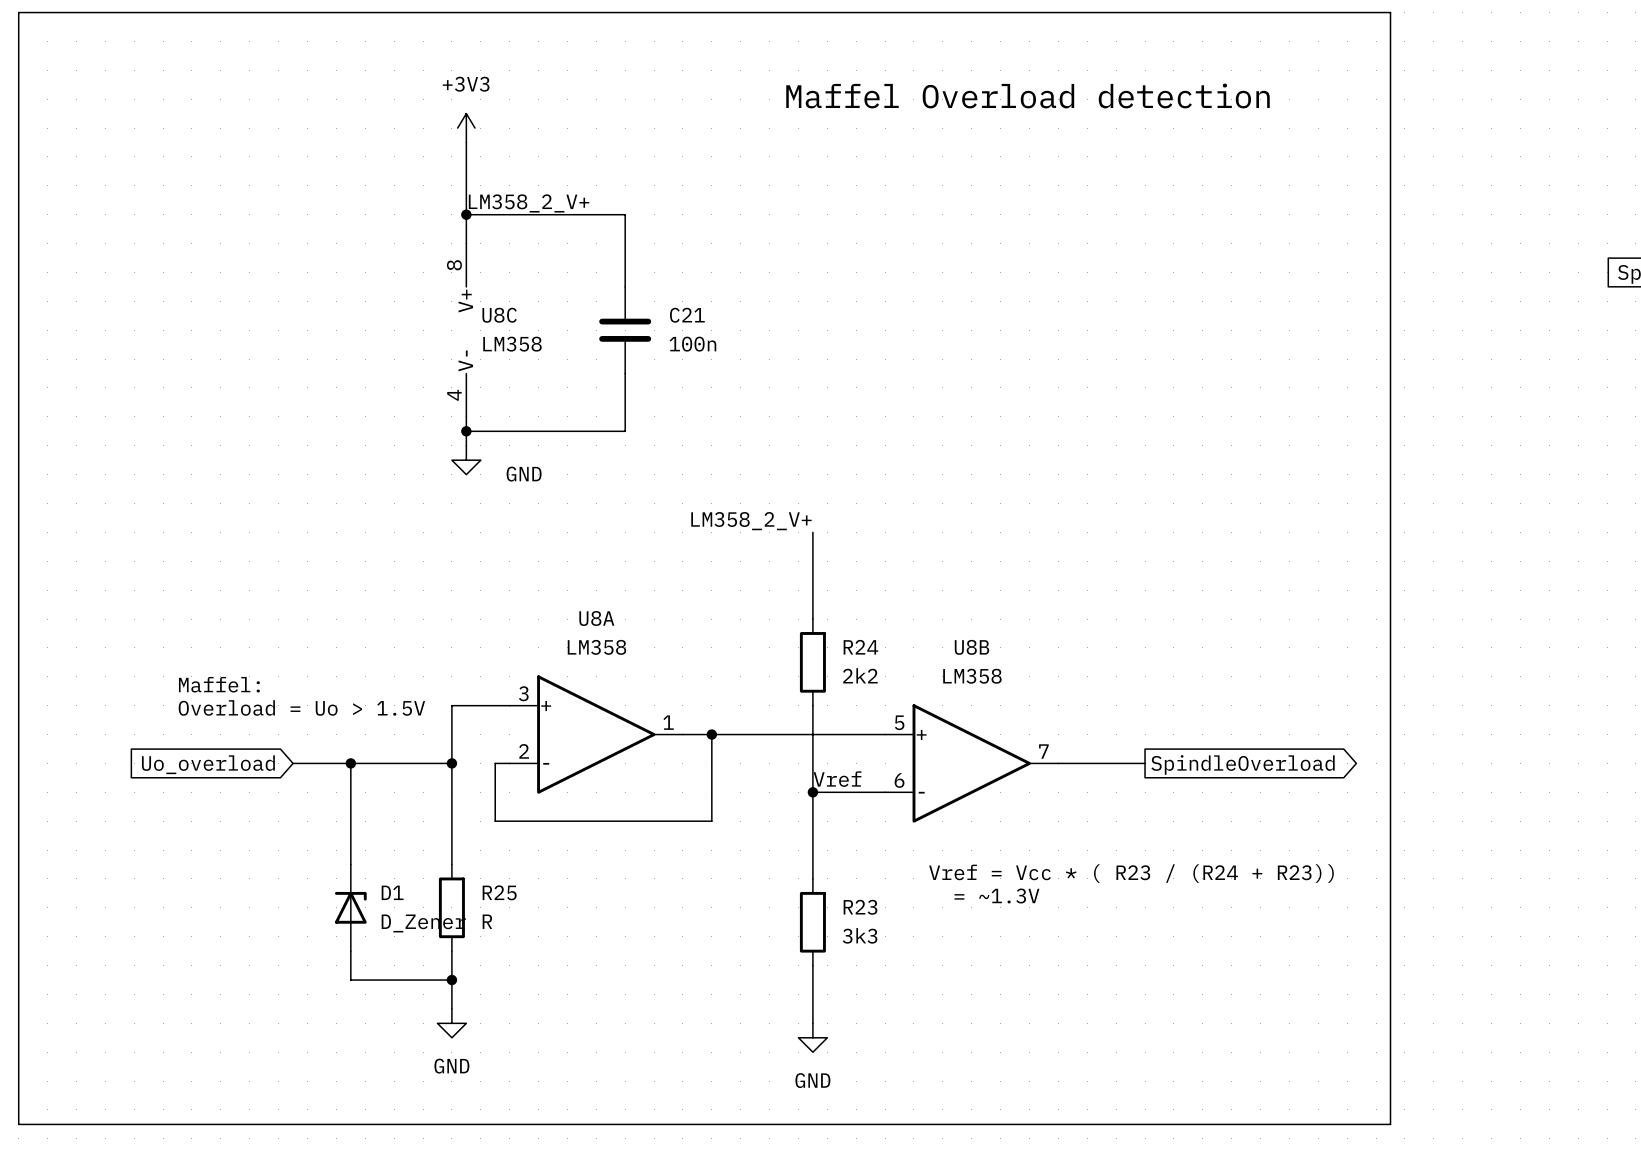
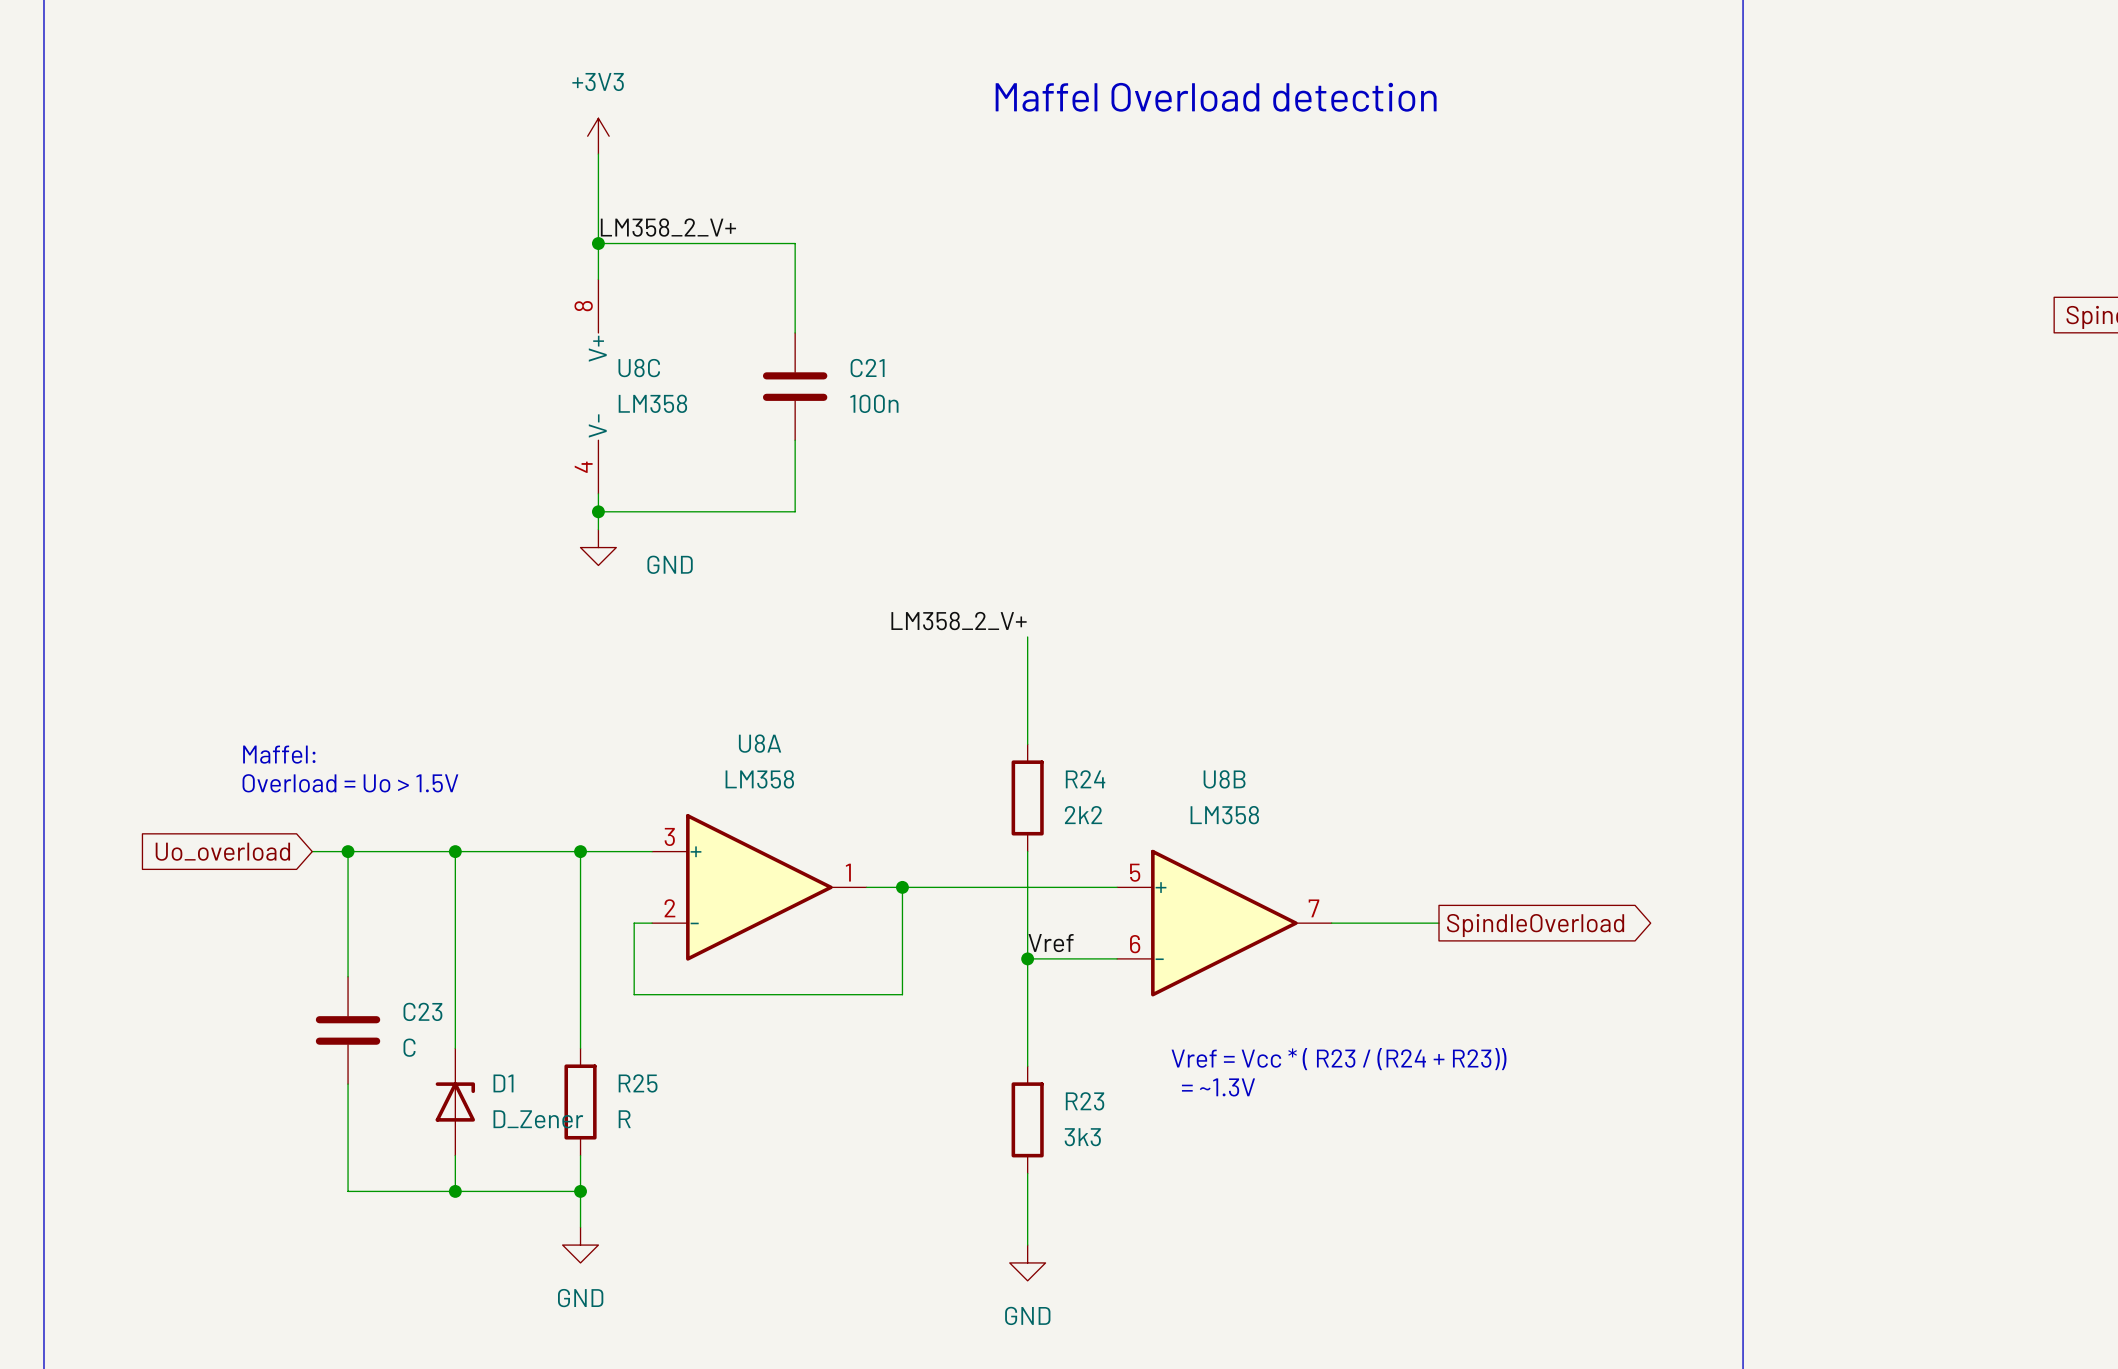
text position: Maffel: (219, 684) -> Maffel: (279, 754)
wire: none -> (312, 851) (580, 851)
wire: none -> (348, 851) (348, 976)
junction: none -> (348, 851)
wire: none -> (455, 851) (455, 923)
junction: none -> (455, 851)
text position: Overload = Uo > 1.5V (301, 707) -> Overload = Uo > 1.5V (350, 783)
wire: (293, 763) (451, 763) -> none
junction: (350, 763) -> none
junction position: (451, 763) -> (580, 851)
global label position: Uo_overload (208, 764) -> Uo_overload (222, 851)
C23: none -> C (348, 1030)
wire: none -> (348, 1084) (348, 1191) (455, 1191)
junction: none -> (455, 1191)

